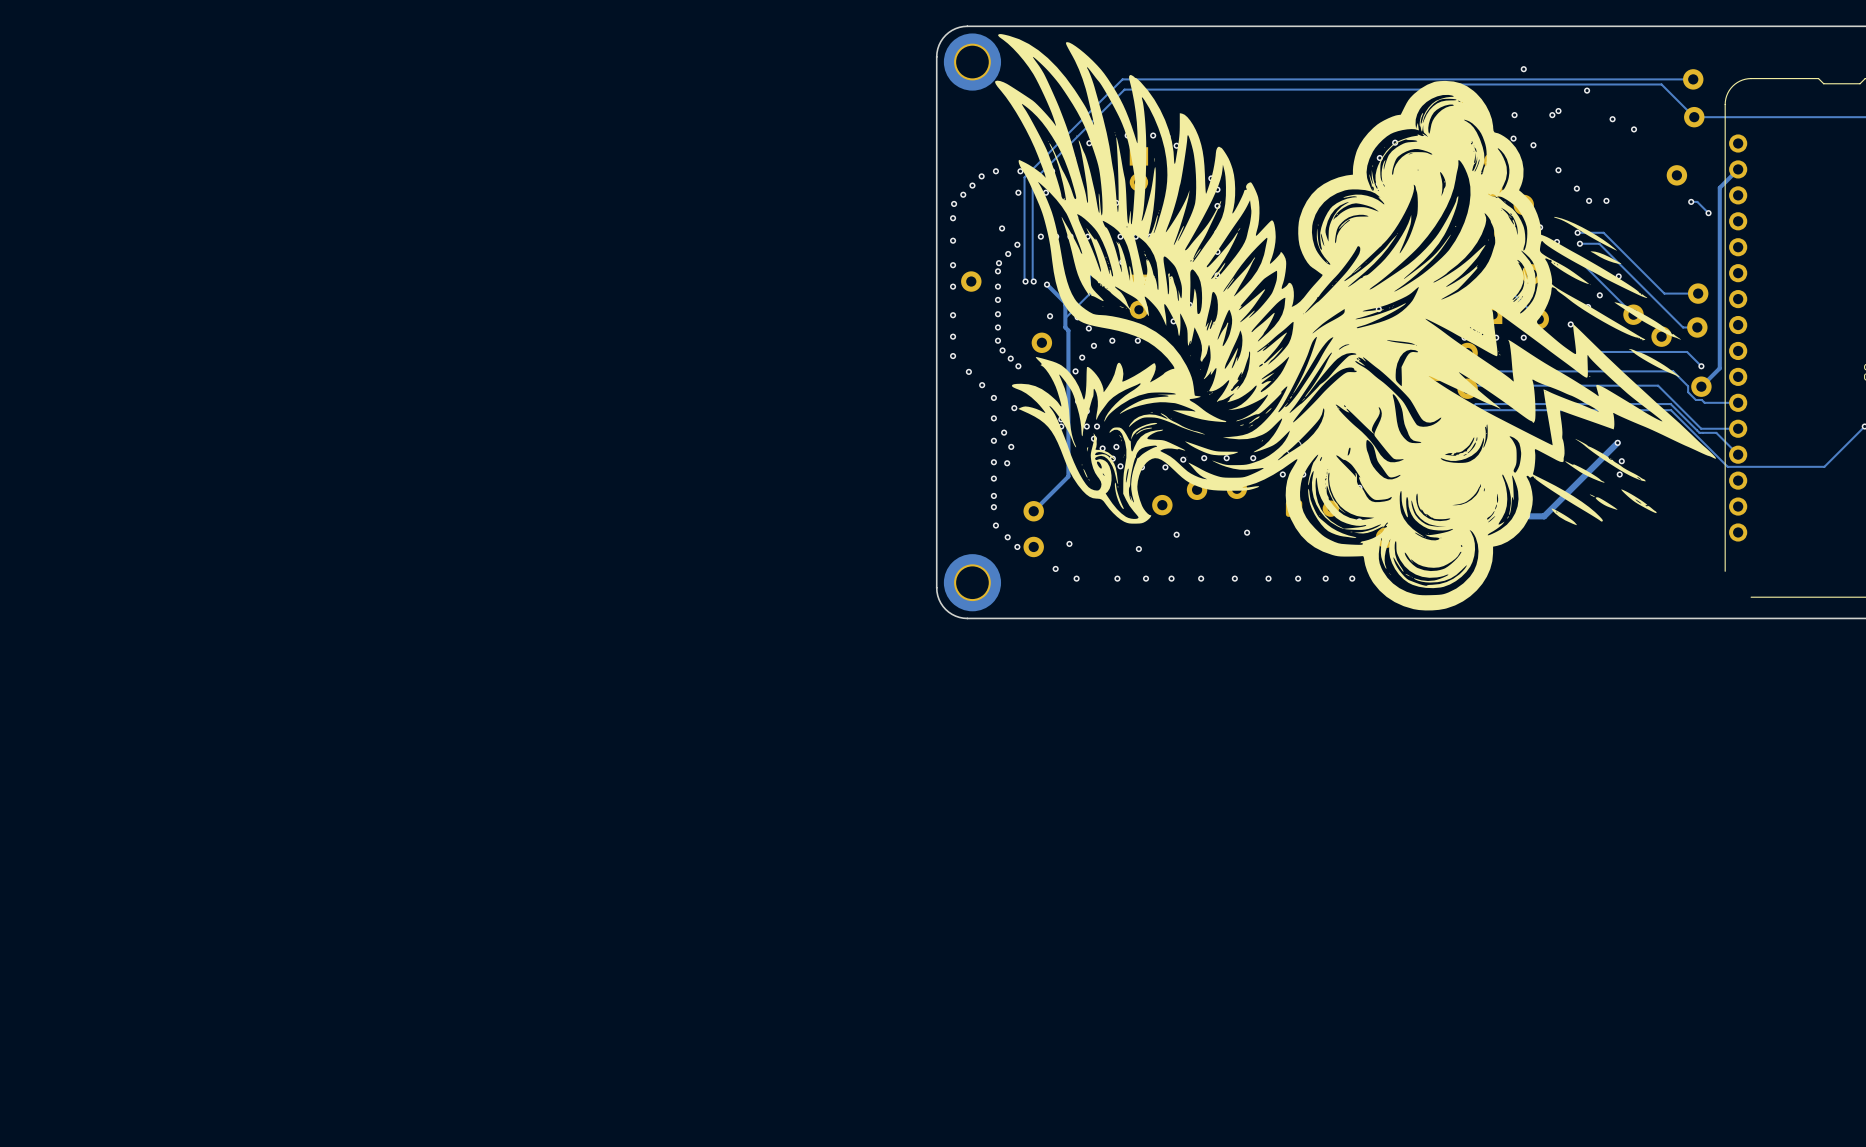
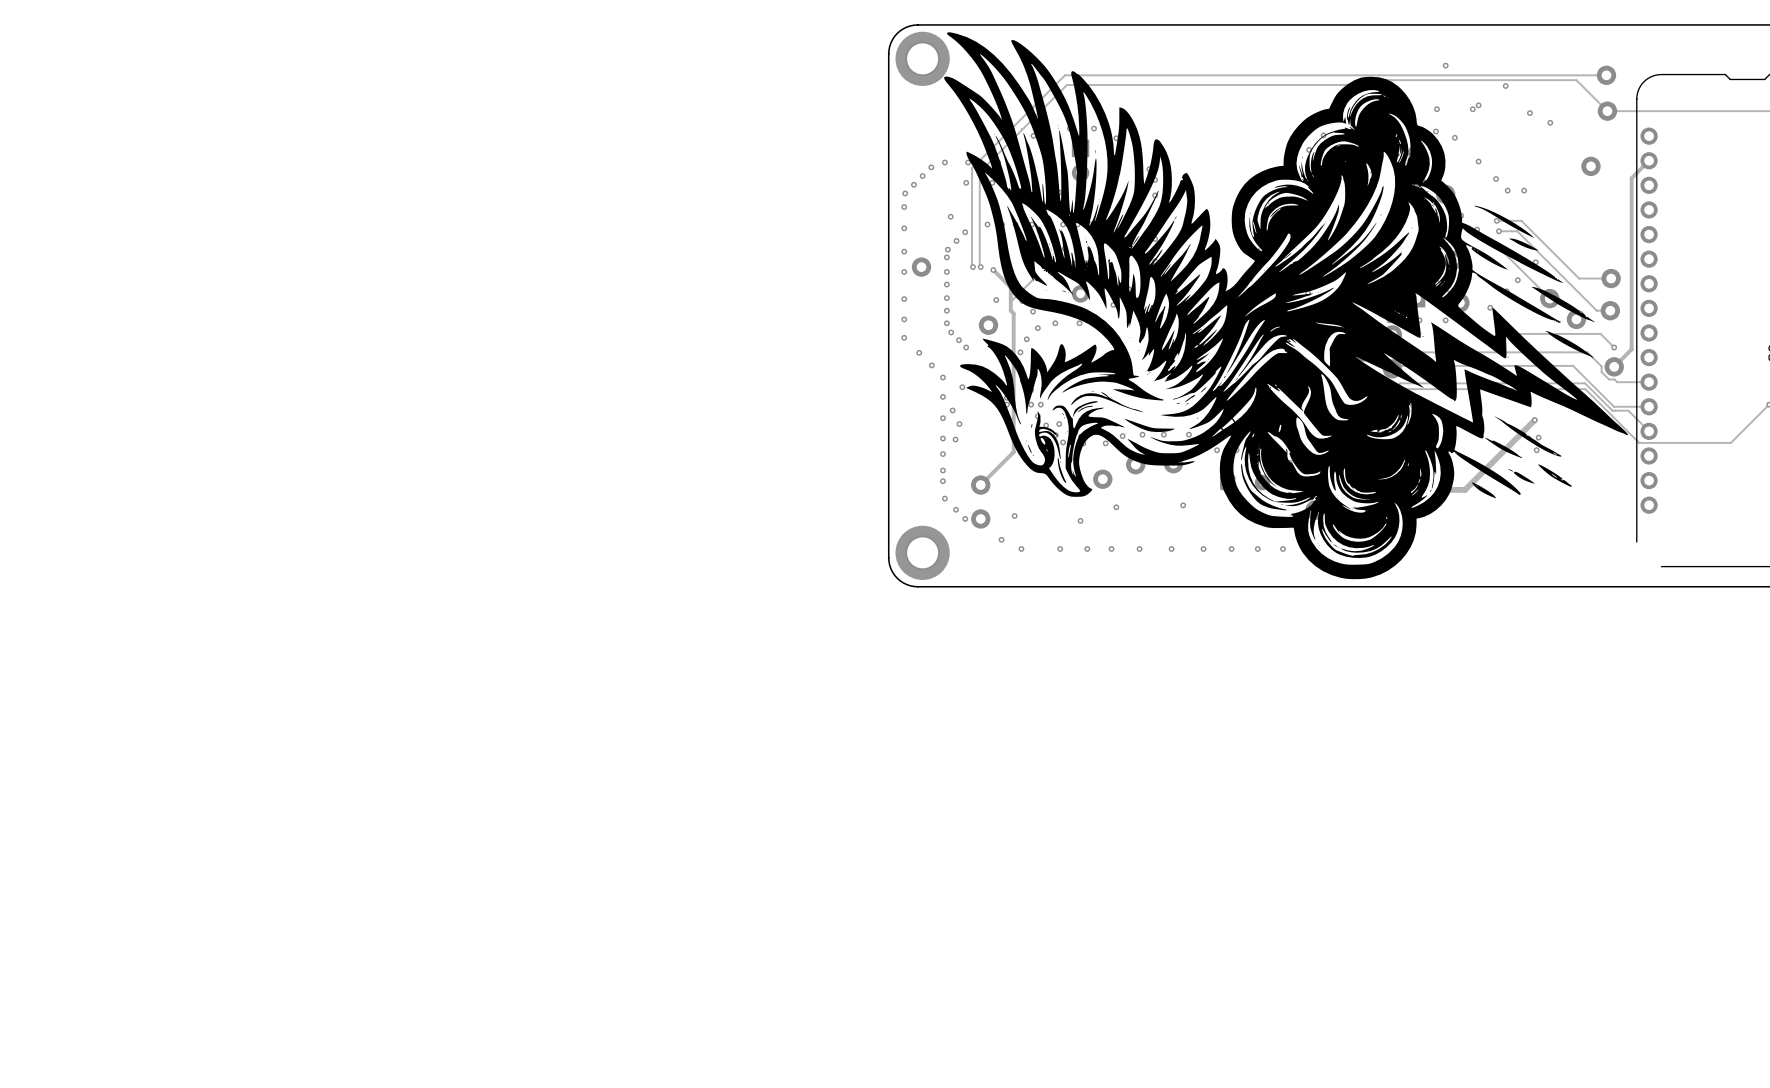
track: (1691, 201) (1697, 201) (1708, 213) -> none
via: (1691, 201) -> none
via: (1708, 213) -> none

